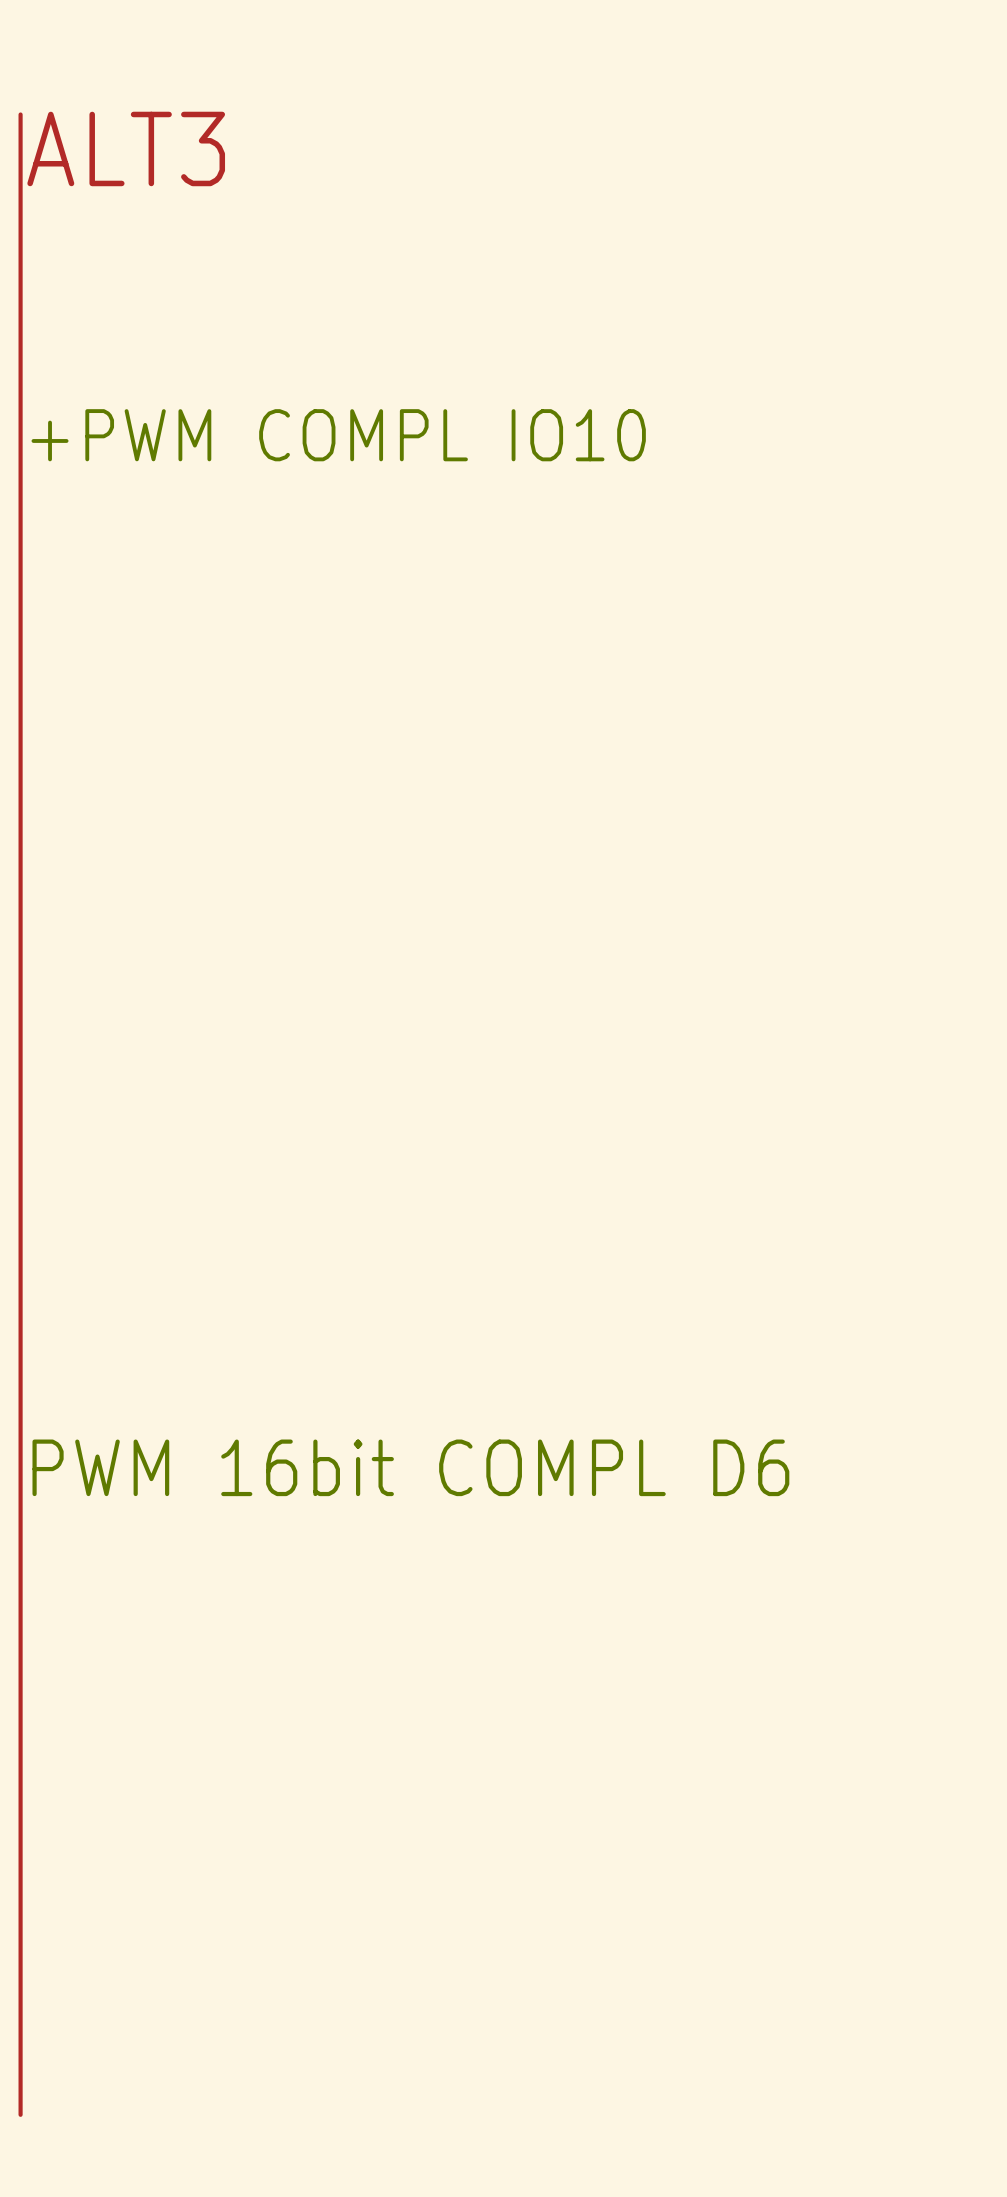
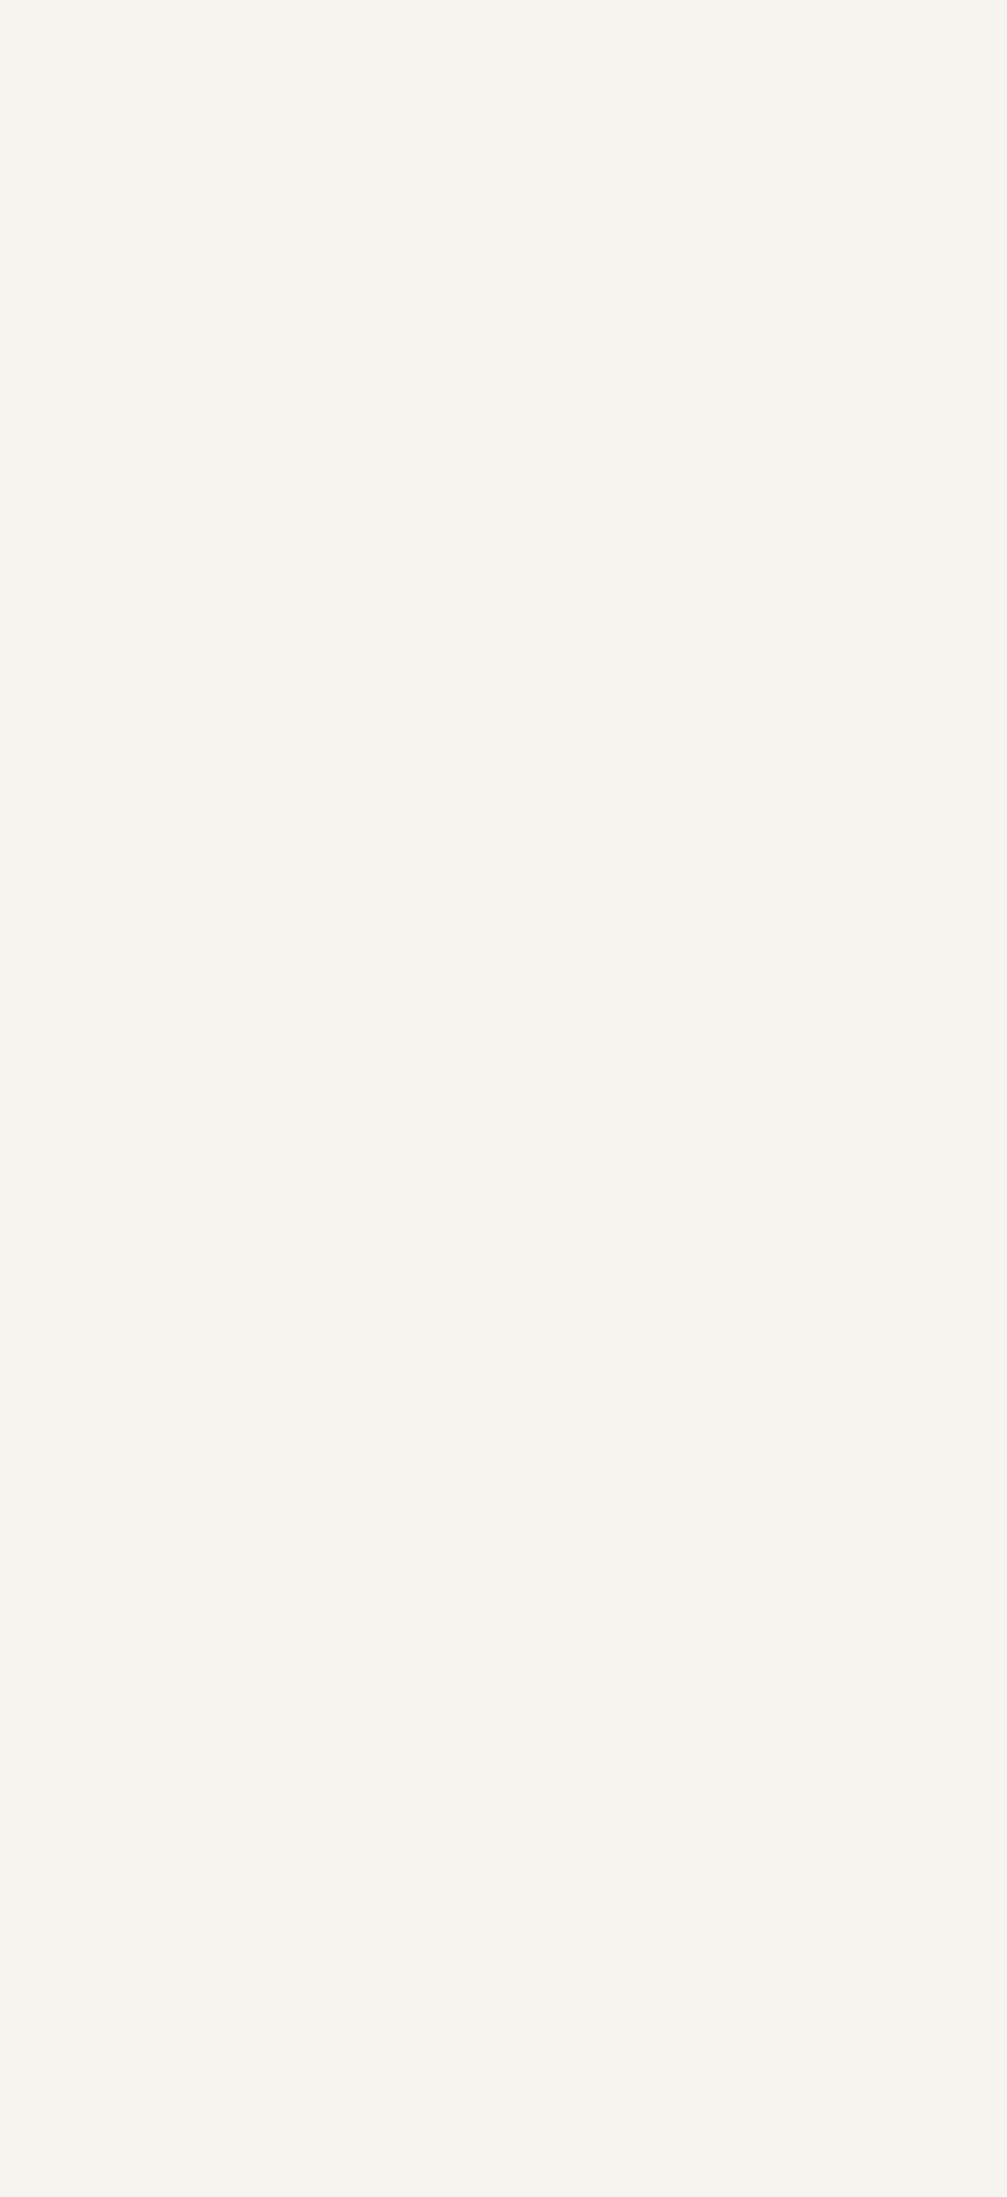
line: (20, 114) (20, 2114) -> none
text: ALT3 (126, 148) -> none
text: +PWM COMPL IO10 (338, 435) -> none
text: PWM 16bit COMPL D6 (410, 1467) -> none

